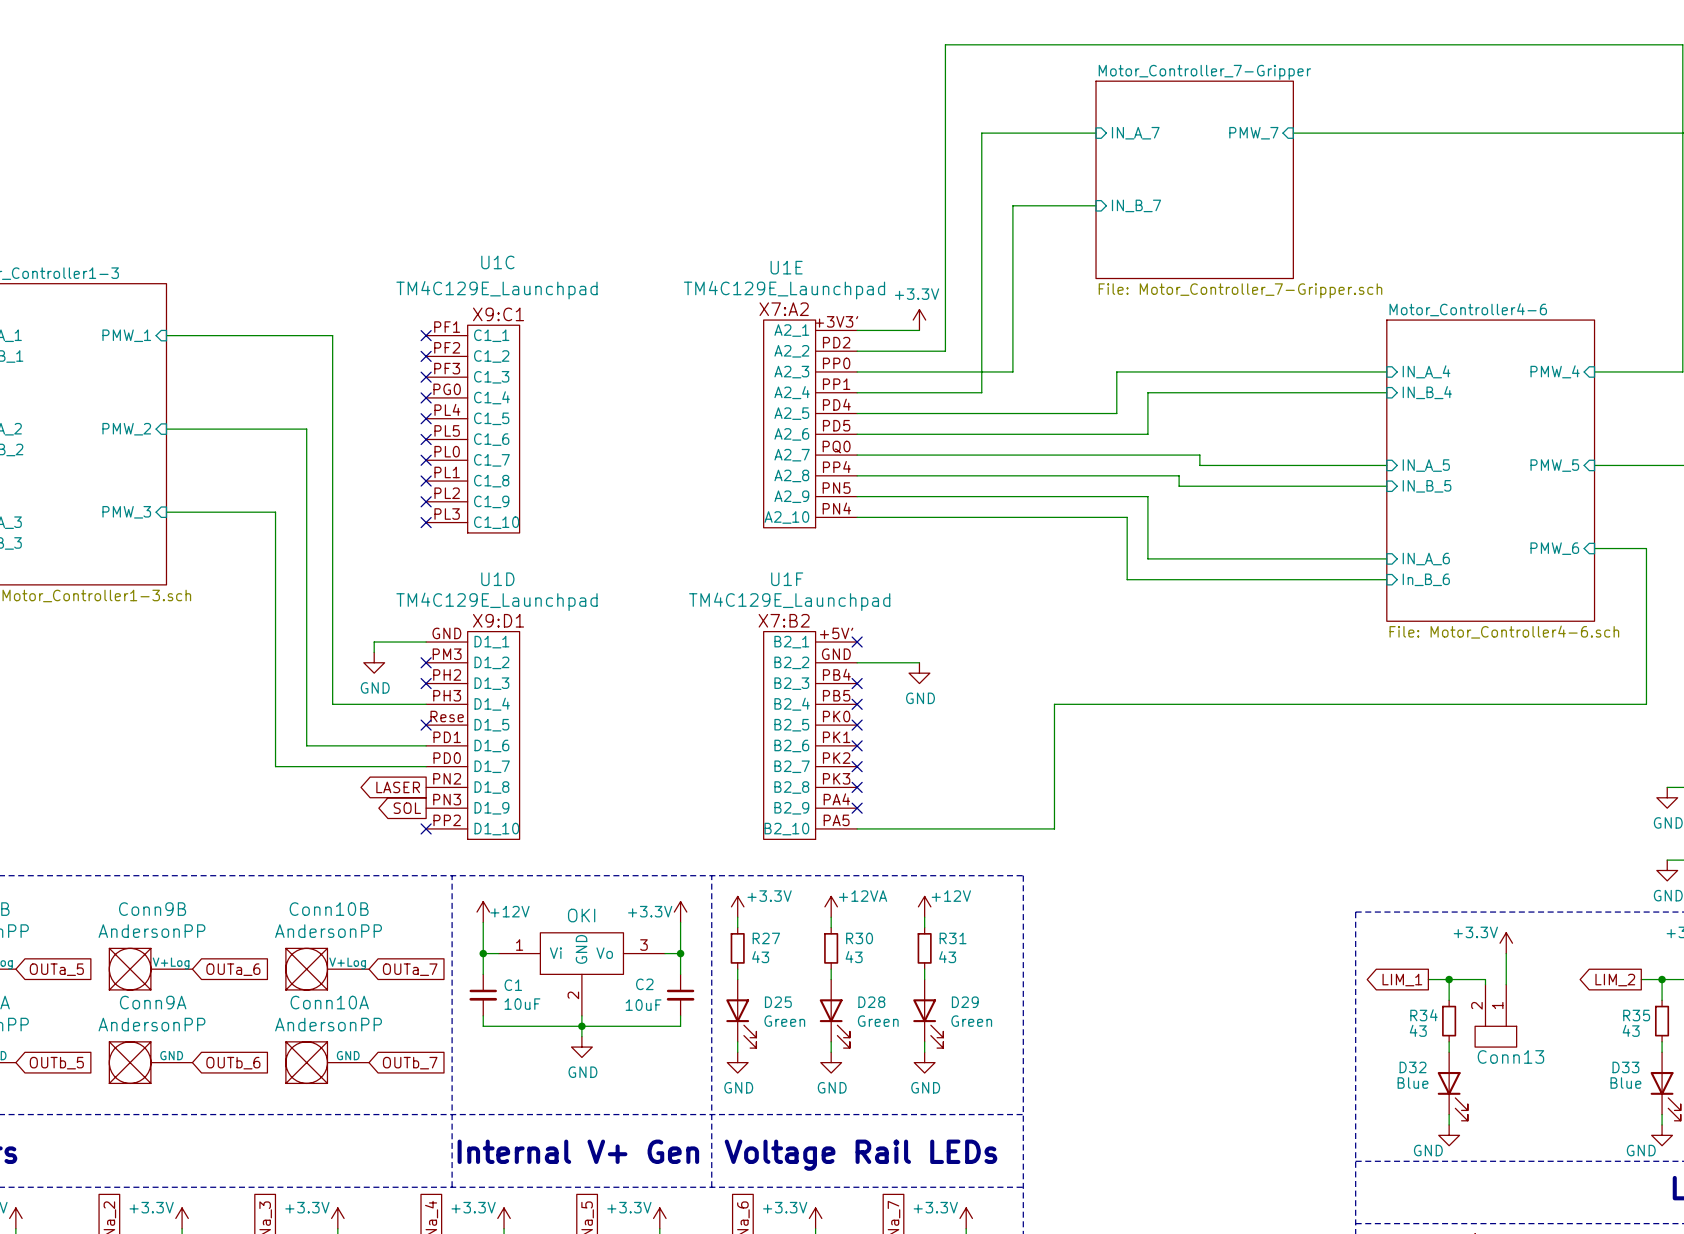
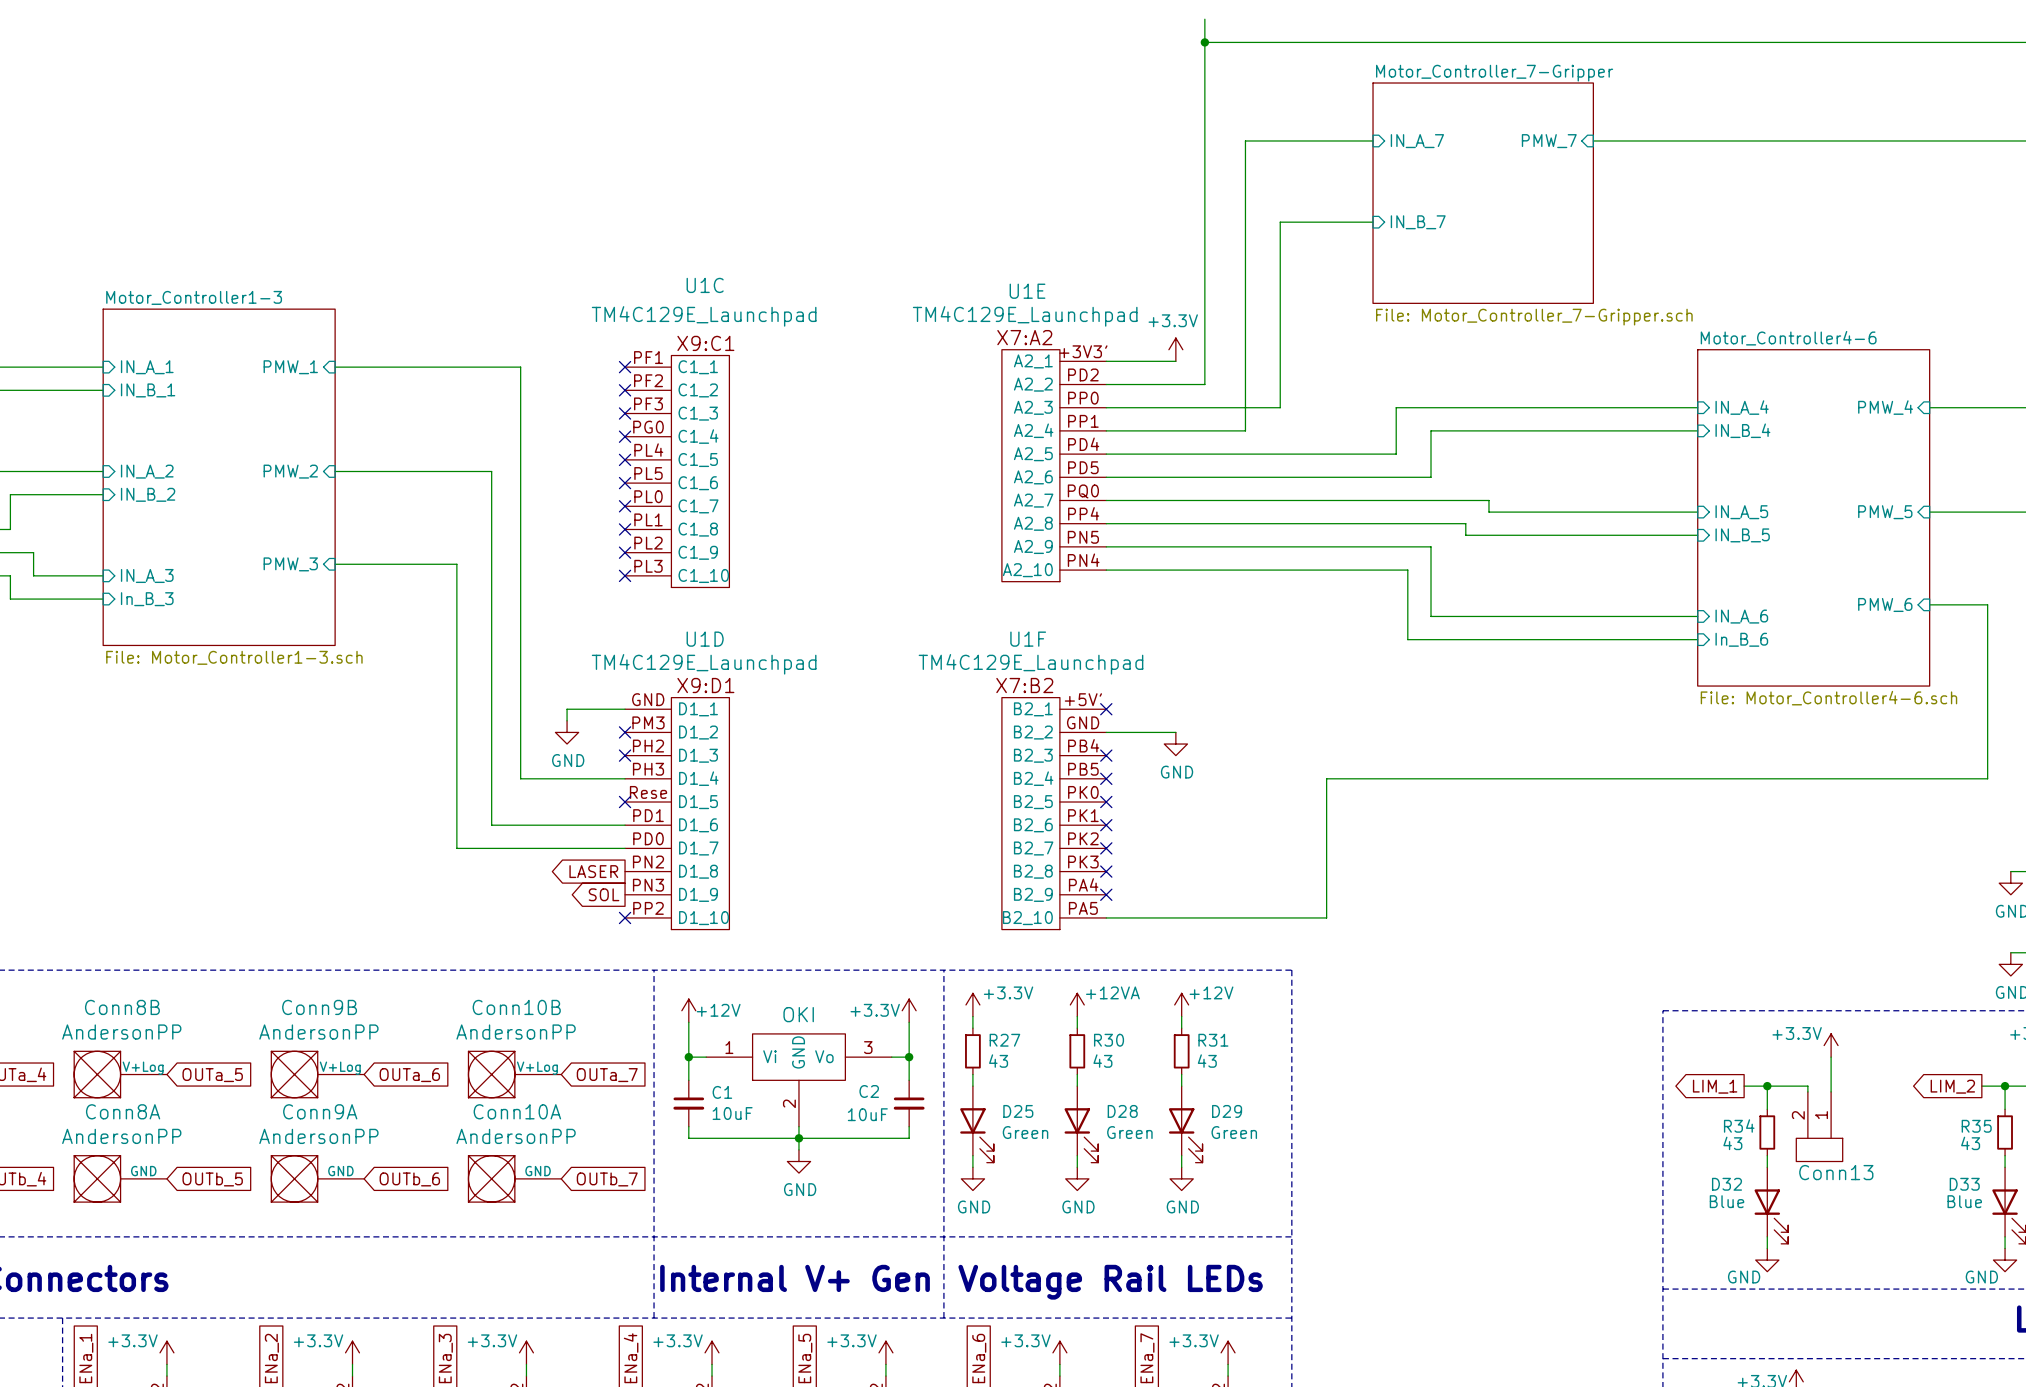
wire: none -> (1204, 19) (1204, 42)
junction: none -> (1204, 42)

